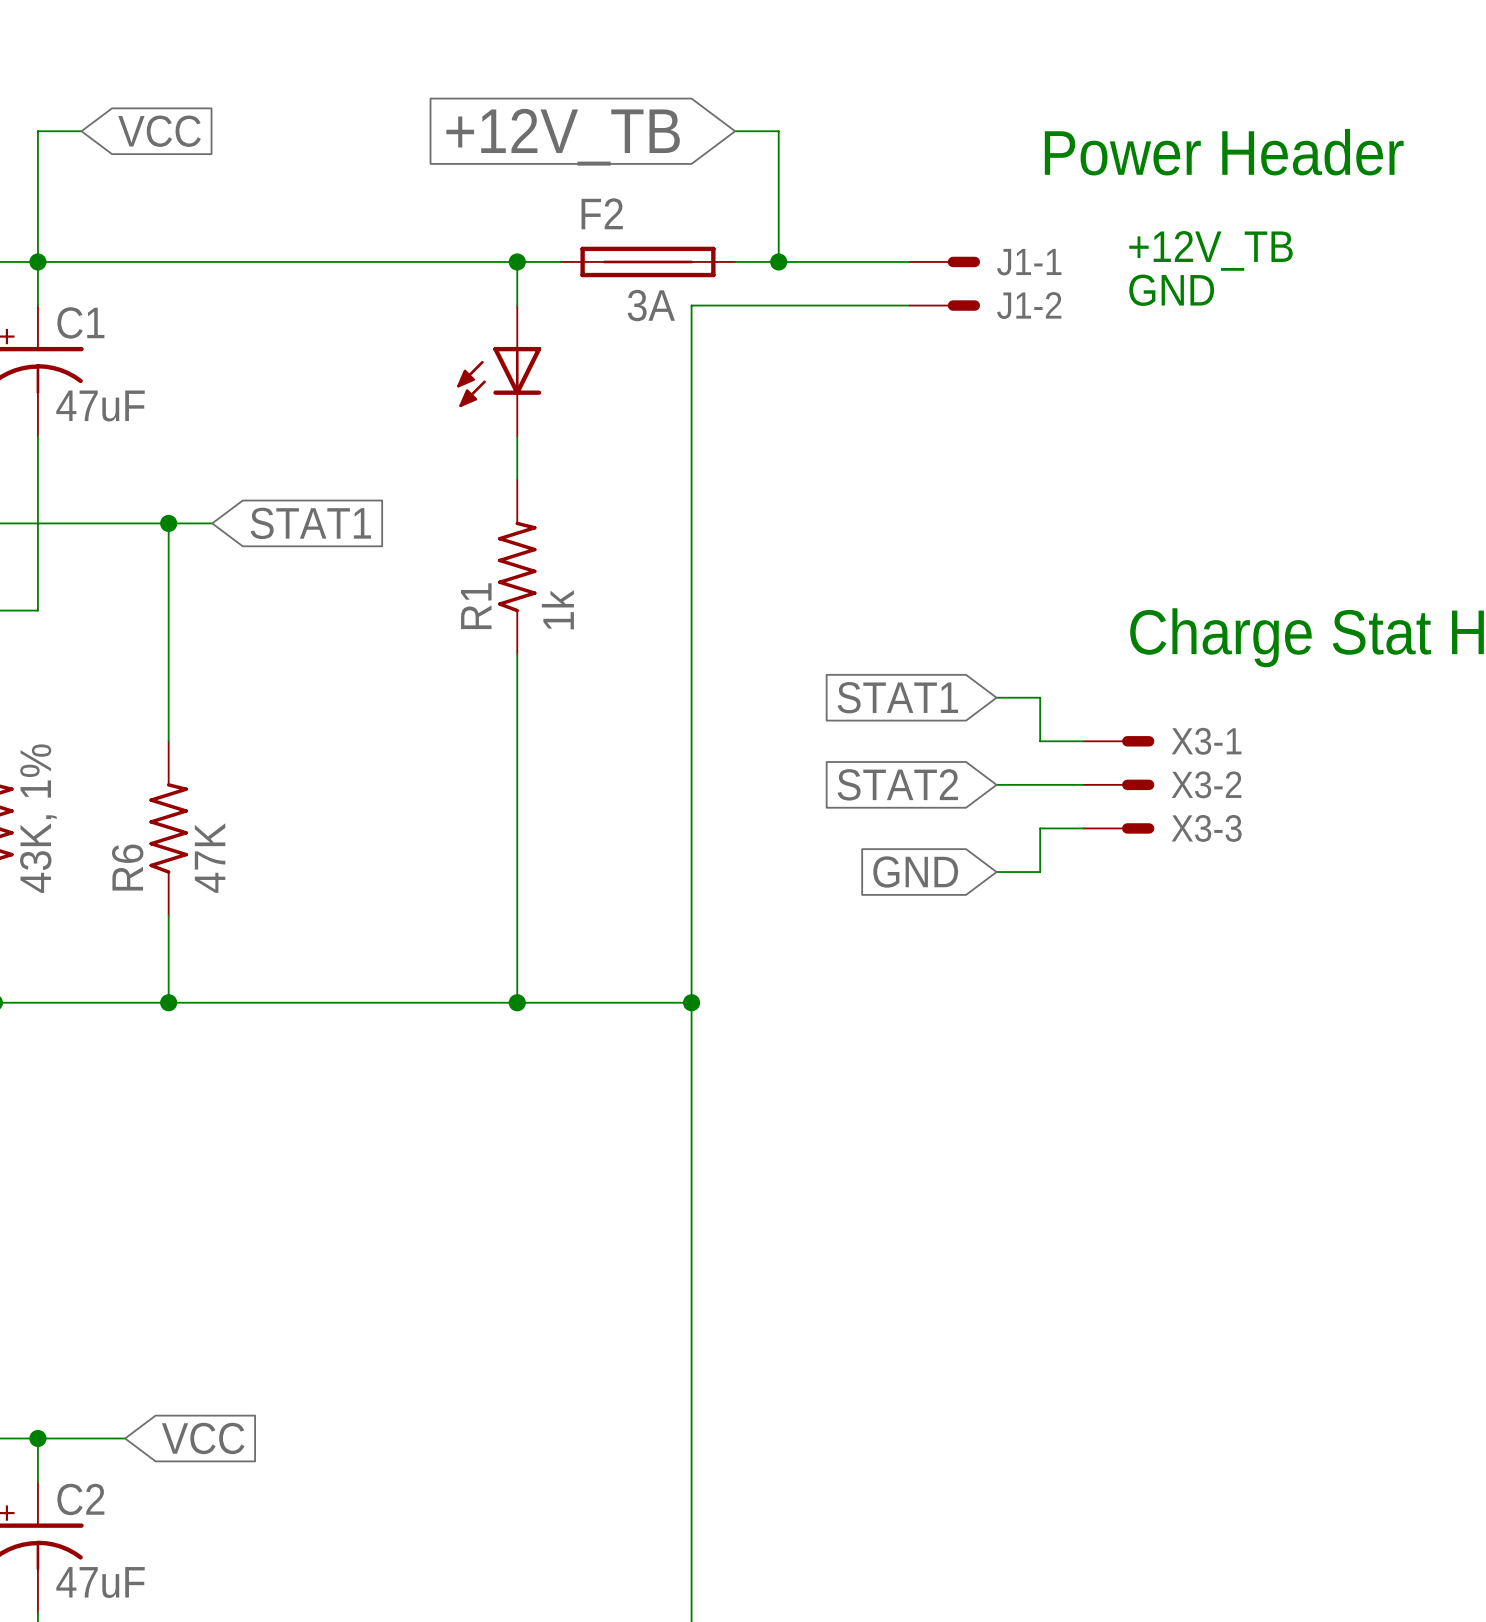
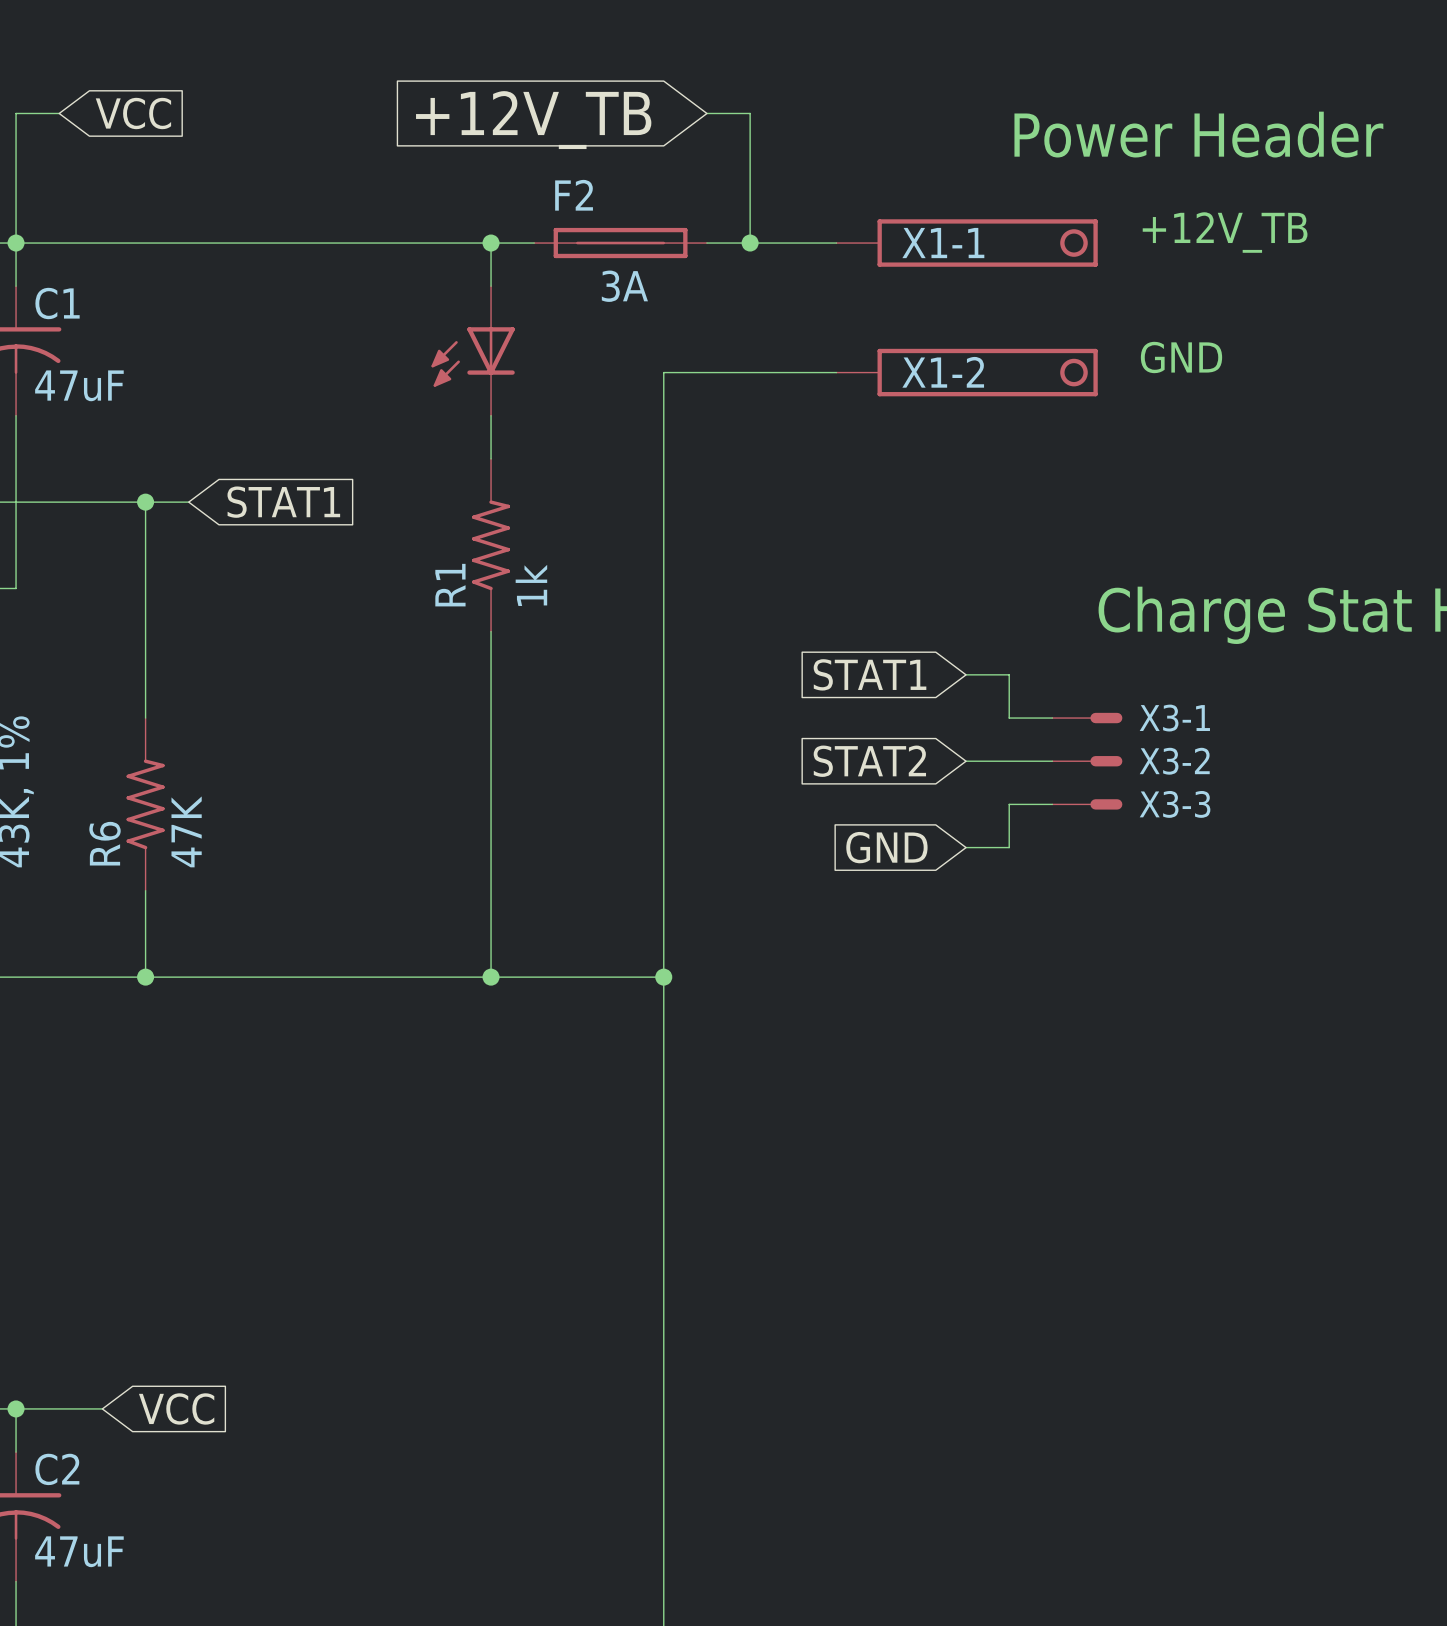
text position: +12V_TB (1210, 250) -> +12V_TB (1225, 232)
J1-1: (944, 261) -> none
X1-1: none -> (967, 243)
text position: GND (1171, 290) -> GND (1181, 357)
wire: (909, 305) (691, 305) (691, 392) -> (836, 372) (663, 372)
J1-2: (944, 305) -> none
X1-2: none -> (967, 372)

